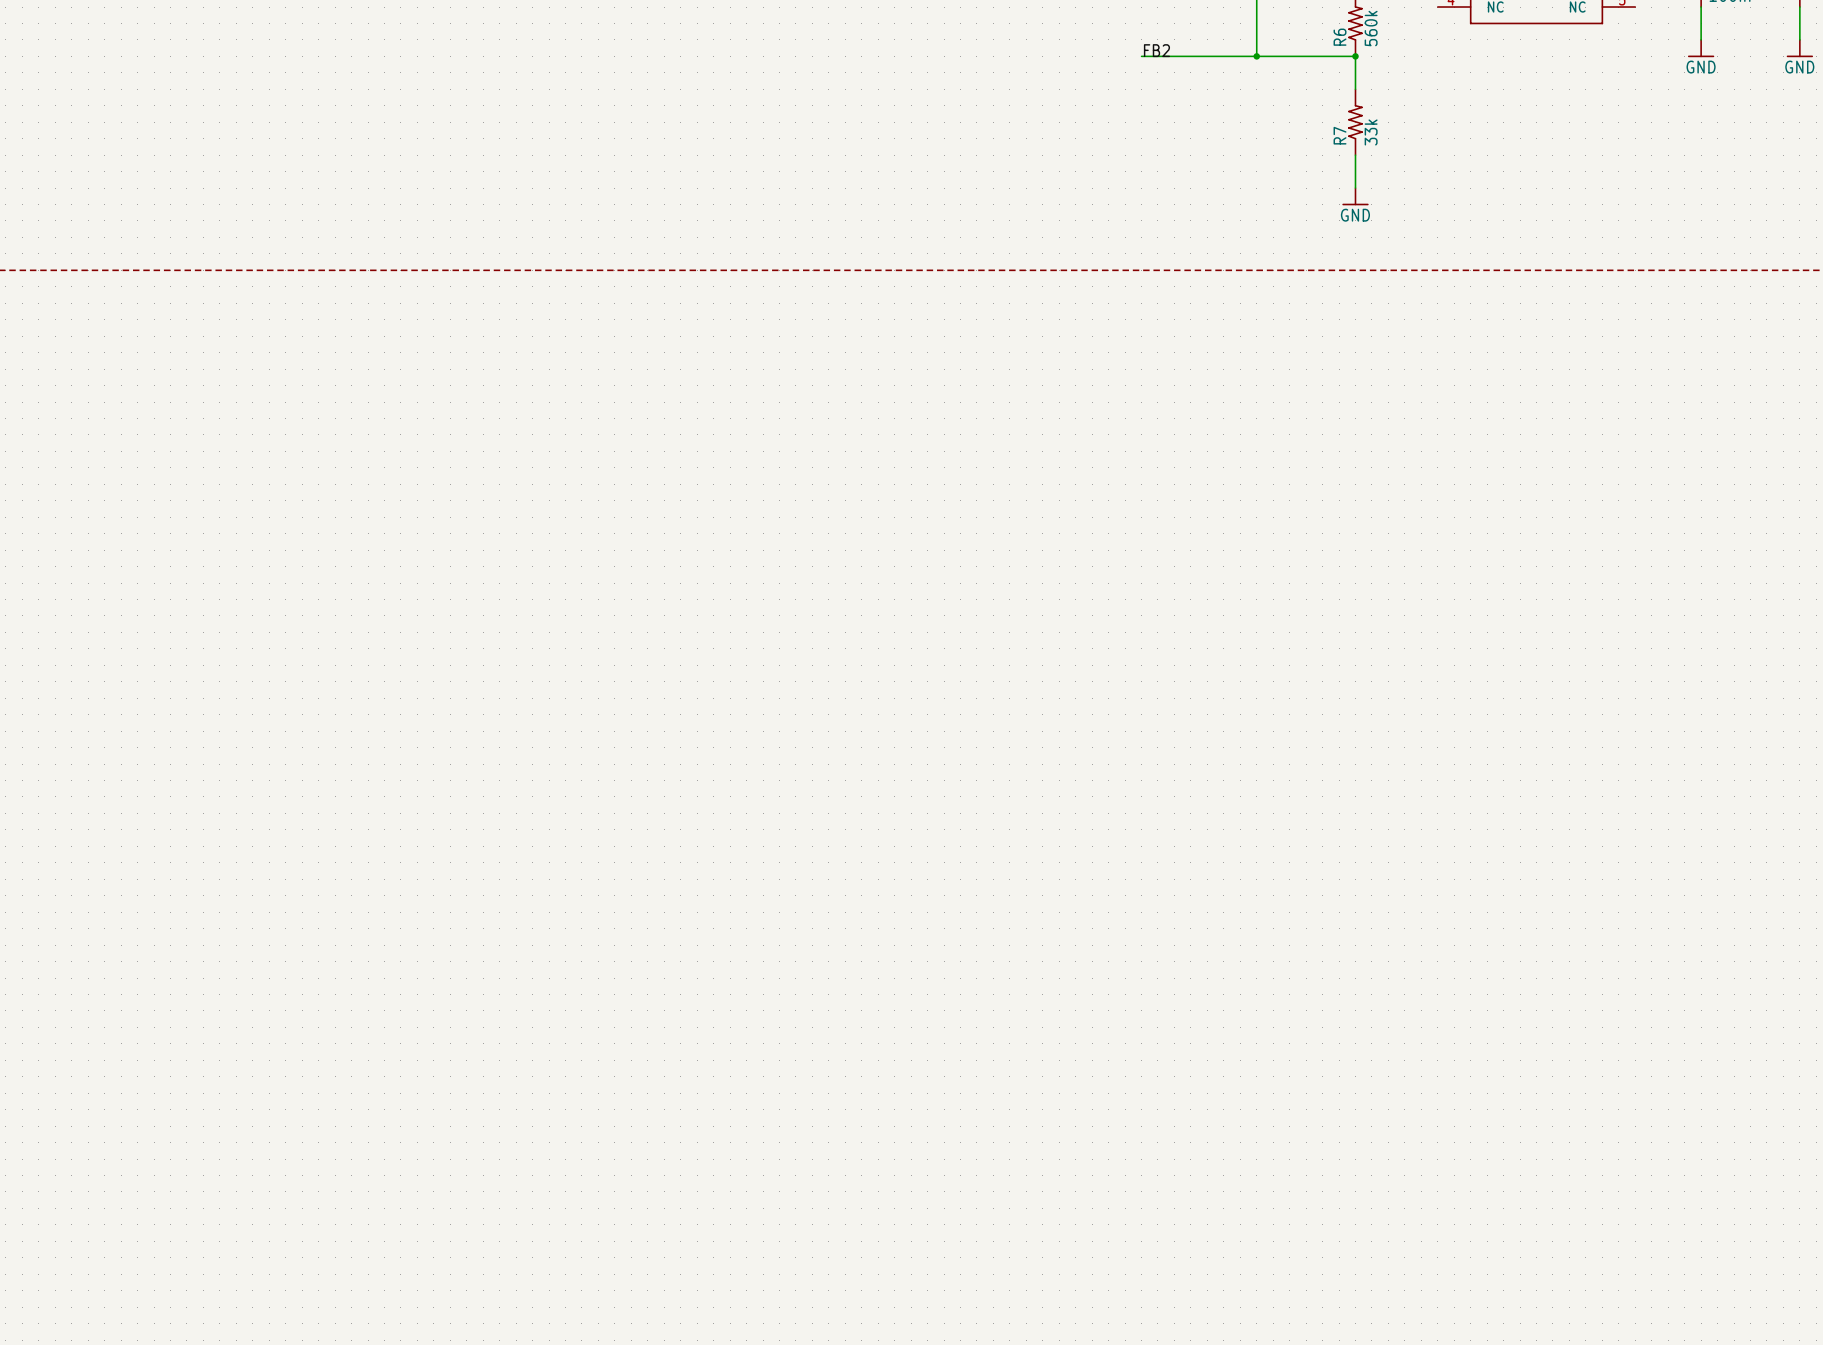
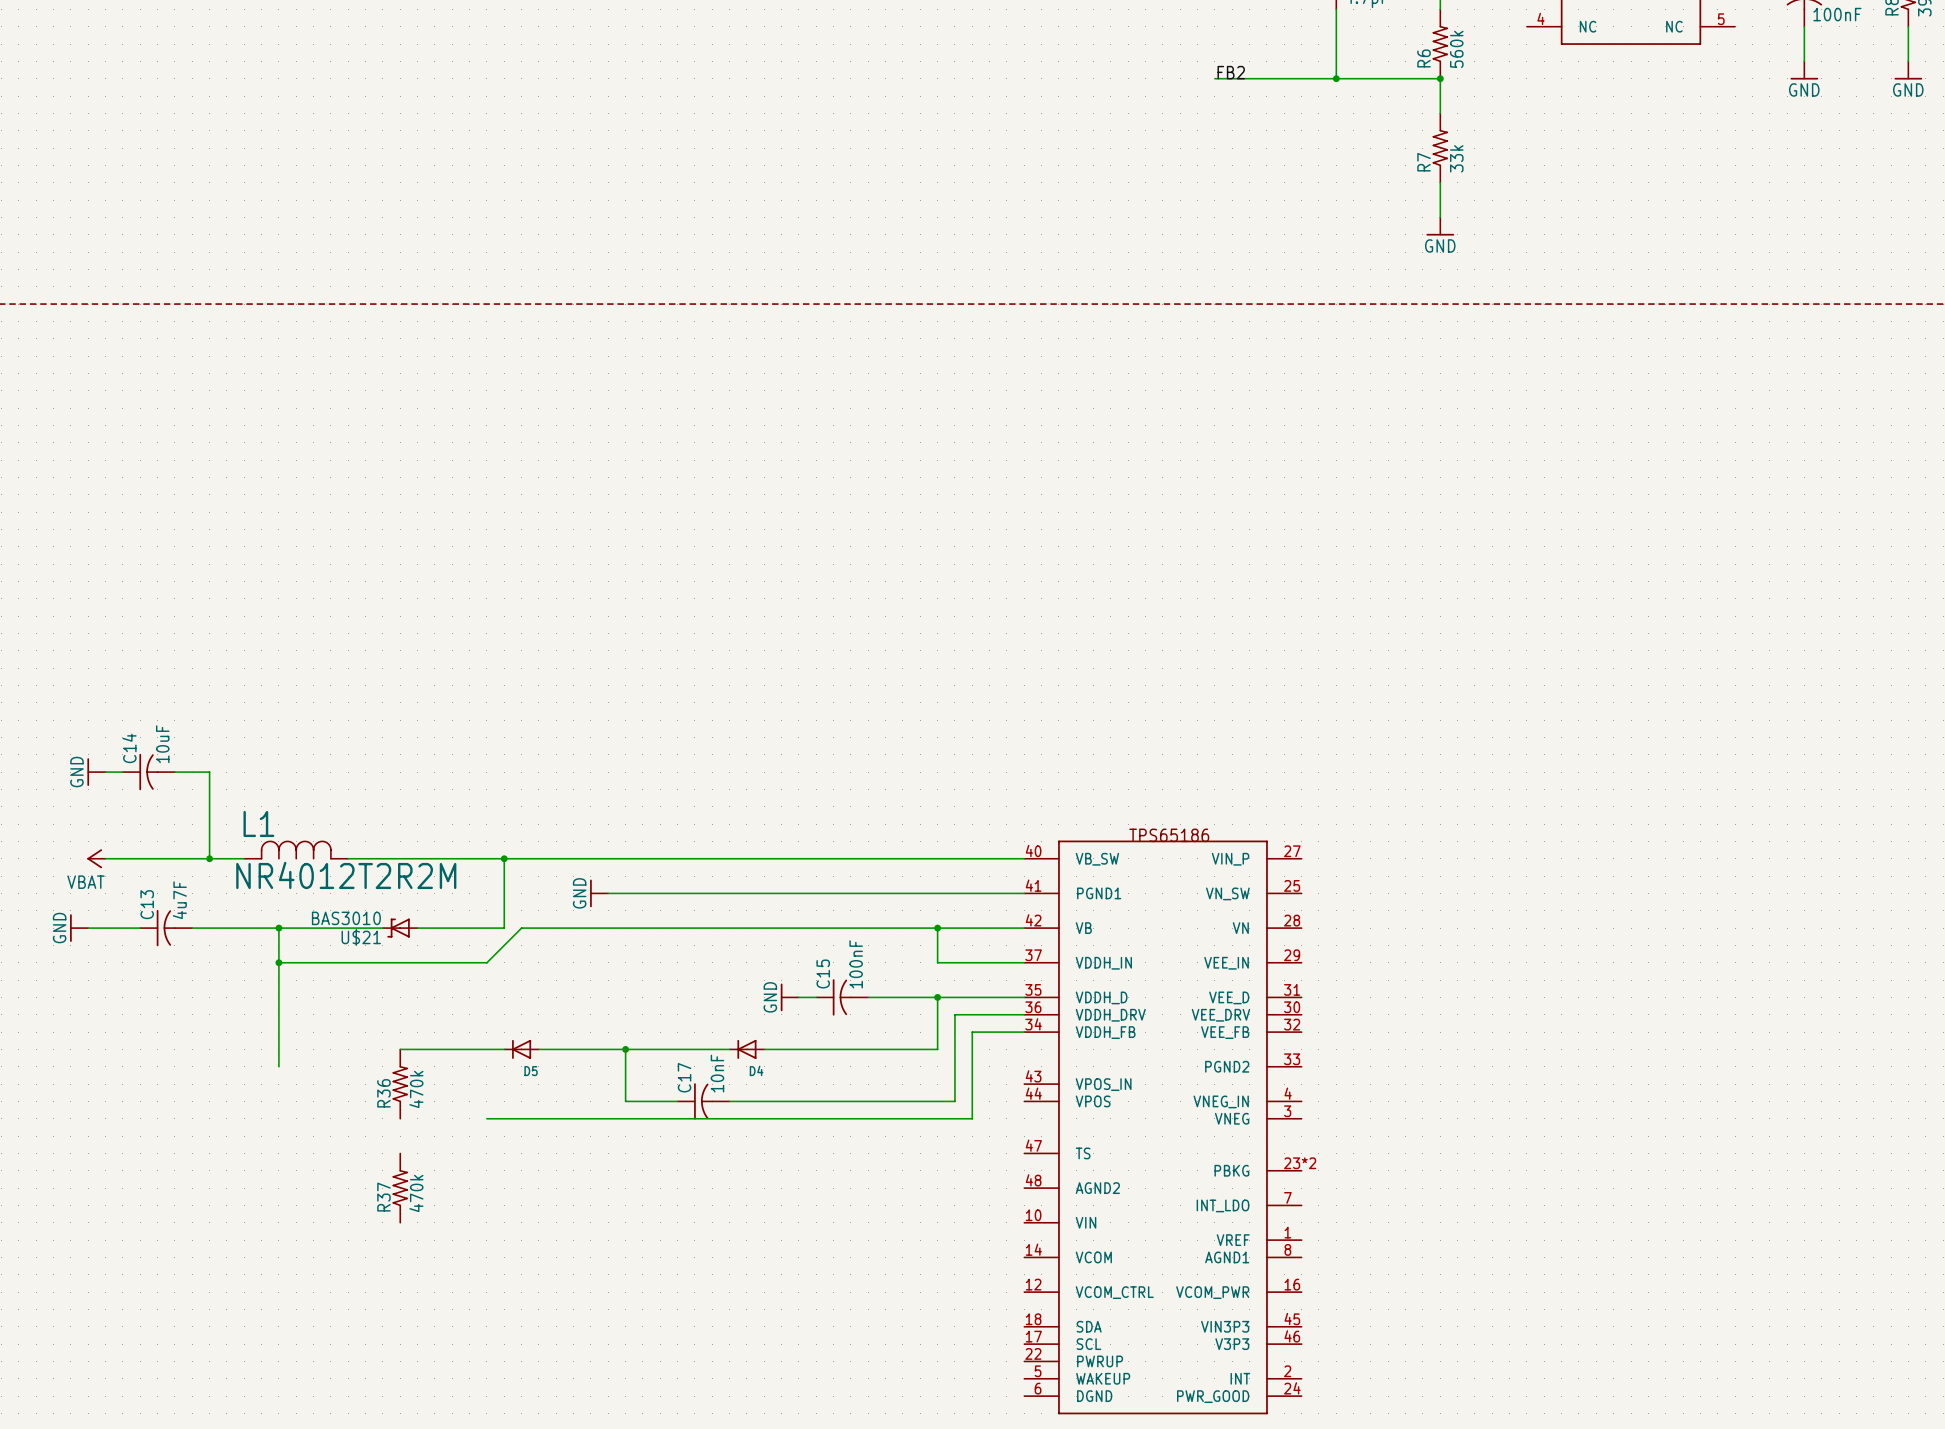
power symbol: none -> GND (96, 772)
wire: none -> (105, 772) (122, 772)
C14: none -> 10uF (148, 772)
wire: none -> (174, 772) (209, 772) (209, 858)
L1: none -> NR4012T2R2M (296, 850)
power symbol: none -> VBAT (96, 858)
wire: none -> (105, 858) (244, 858)
junction: none -> (209, 858)
wire: none -> (348, 858) (1024, 858)
wire: none -> (504, 858) (504, 928) (417, 928)
junction: none -> (504, 858)
power symbol: none -> GND (599, 893)
wire: none -> (608, 893) (1024, 893)
power symbol: none -> GND (79, 928)
wire: none -> (88, 928) (140, 928)
C13: none -> 4u7F (166, 928)
wire: none -> (192, 928) (382, 928)
wire: none -> (278, 928) (278, 1066)
junction: none -> (278, 928)
U$21: none -> BAS3010 (400, 928)
wire: none -> (937, 928) (937, 962) (1024, 962)
junction: none -> (937, 928)
wire: none -> (1024, 928) (521, 928) (486, 962) (278, 962)
junction: none -> (278, 962)
power symbol: none -> GND (789, 997)
wire: none -> (798, 997) (816, 997)
C15: none -> 100nF (842, 997)
wire: none -> (868, 997) (1024, 997)
wire: none -> (937, 997) (937, 1049) (764, 1049)
junction: none -> (937, 997)
wire: none -> (1024, 1014) (954, 1014) (954, 1101) (729, 1101)
wire: none -> (1024, 1032) (972, 1032) (972, 1118) (486, 1118)
wire: none -> (400, 1049) (504, 1049)
D5: none -> (521, 1049)
wire: none -> (538, 1049) (729, 1049)
wire: none -> (625, 1049) (625, 1101) (677, 1101)
junction: none -> (625, 1049)
D4: none -> (746, 1049)
R36: none -> 470k (400, 1084)
C17: none -> 10nF (703, 1101)
part: none -> (1162, 1127)
R37: none -> 470k (400, 1188)

